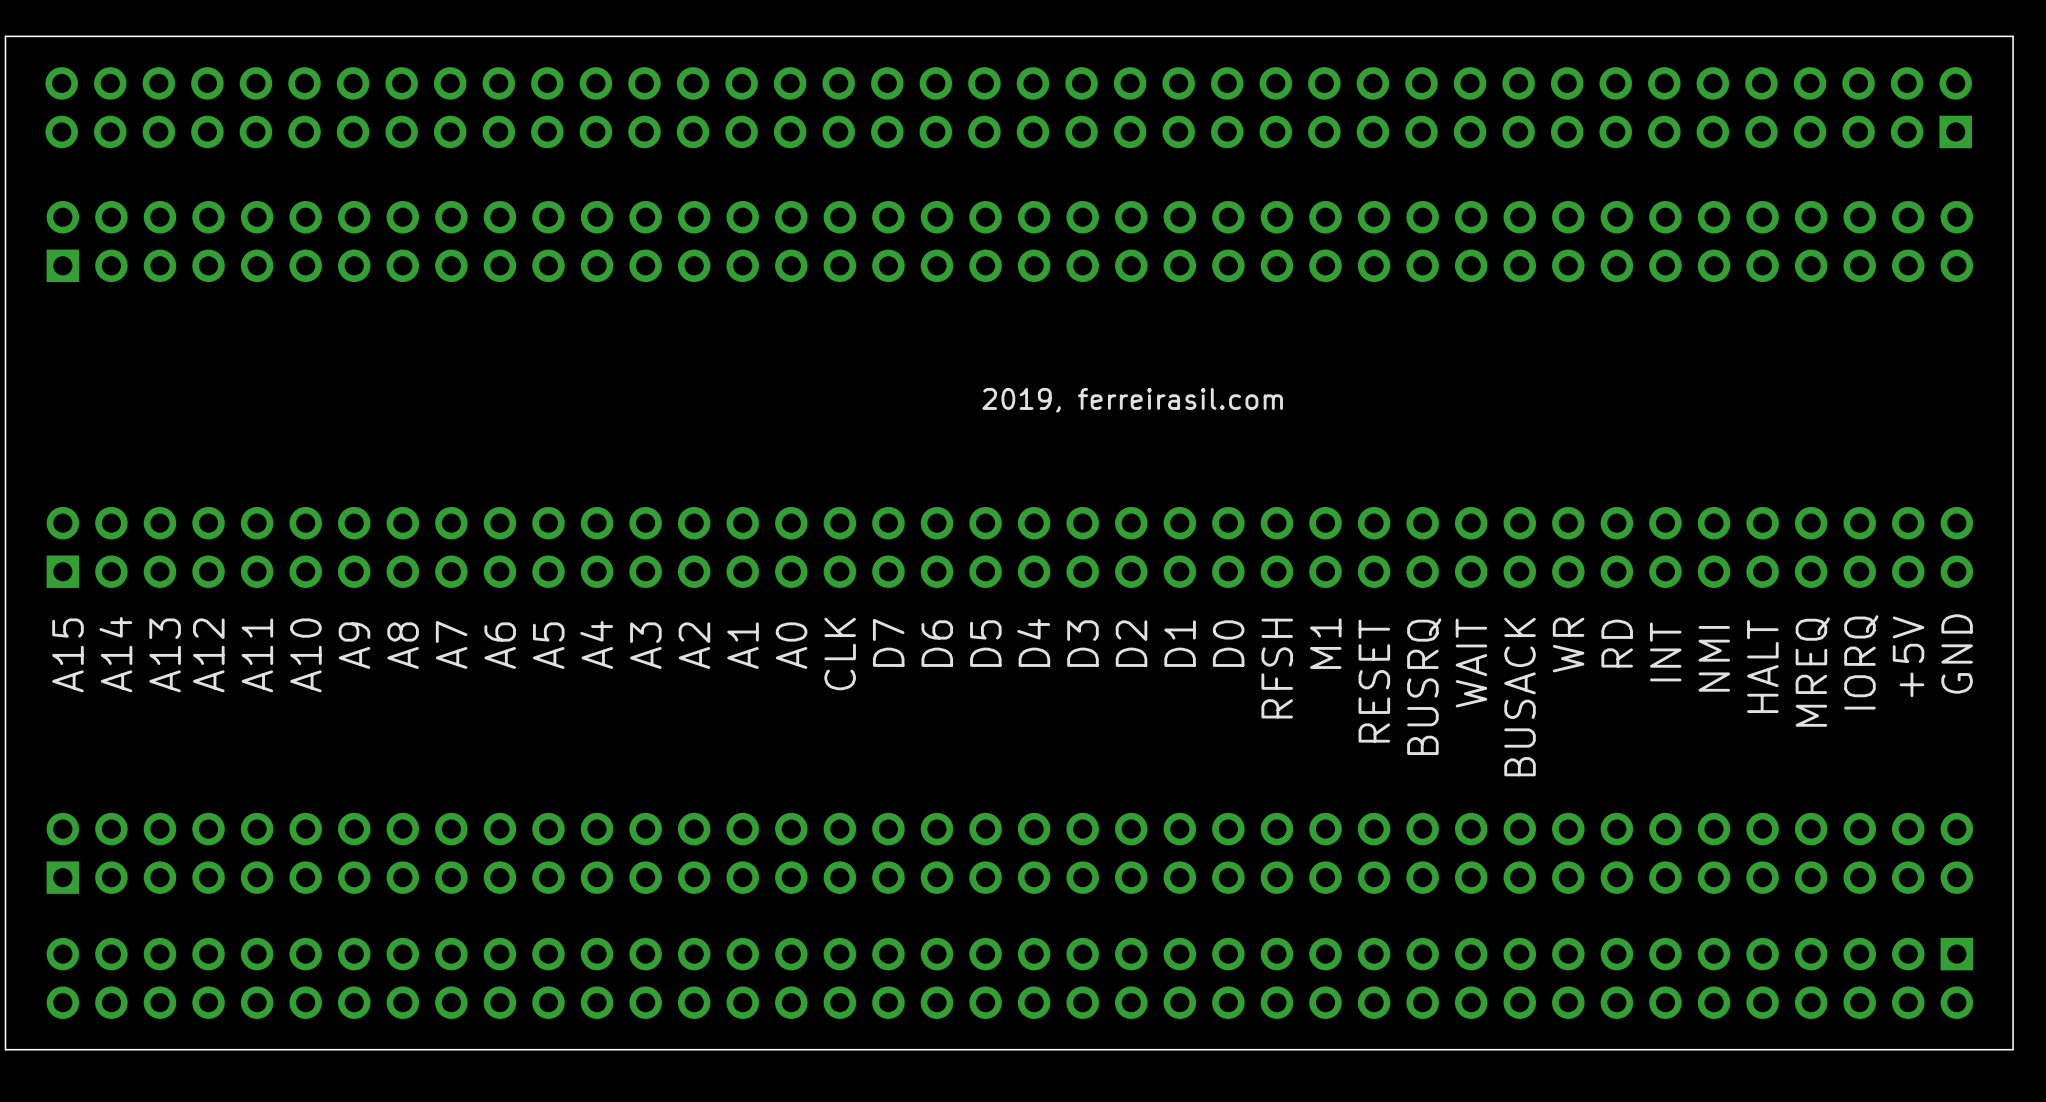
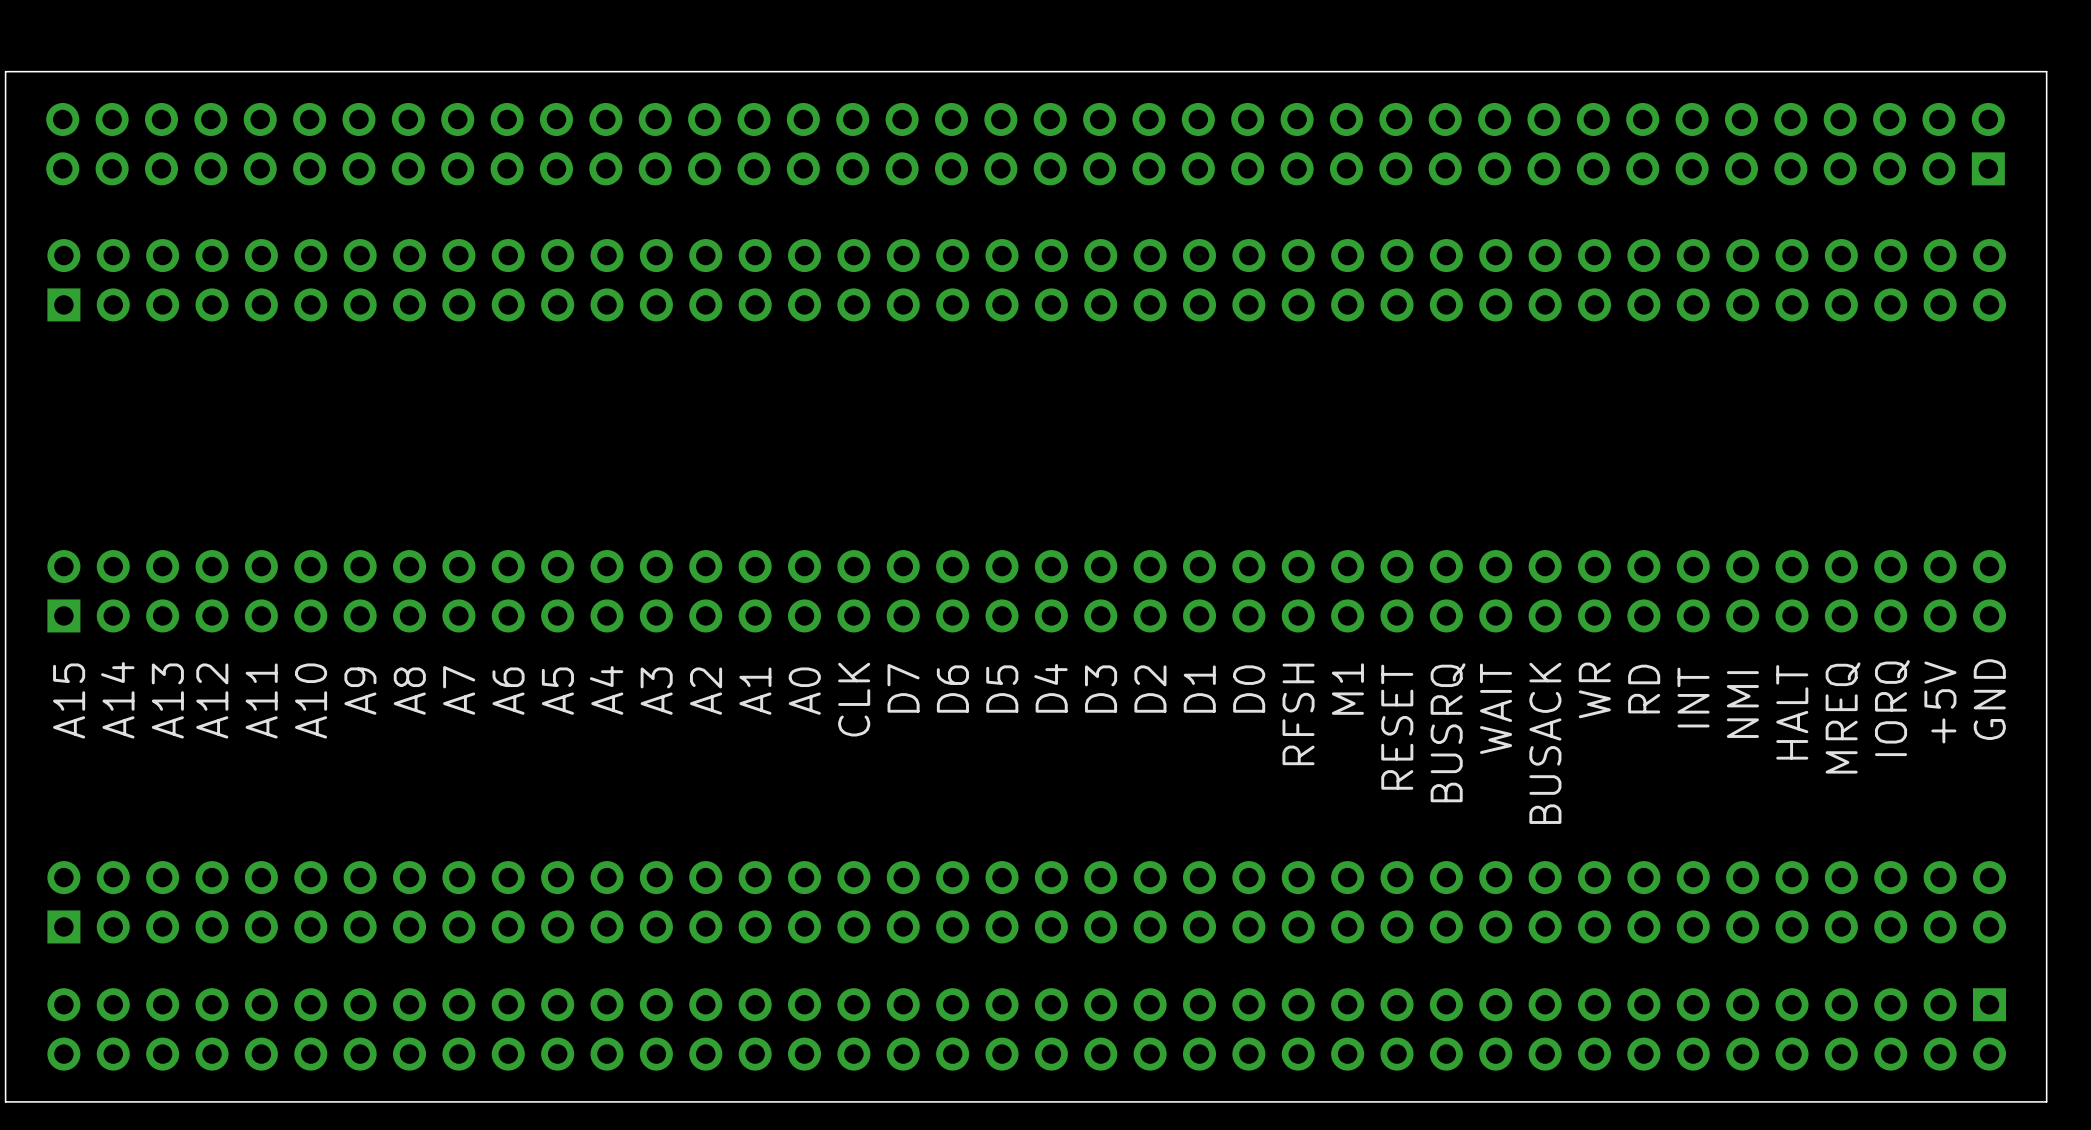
text: 2019, ferreirasil.com (1132, 400) -> none

